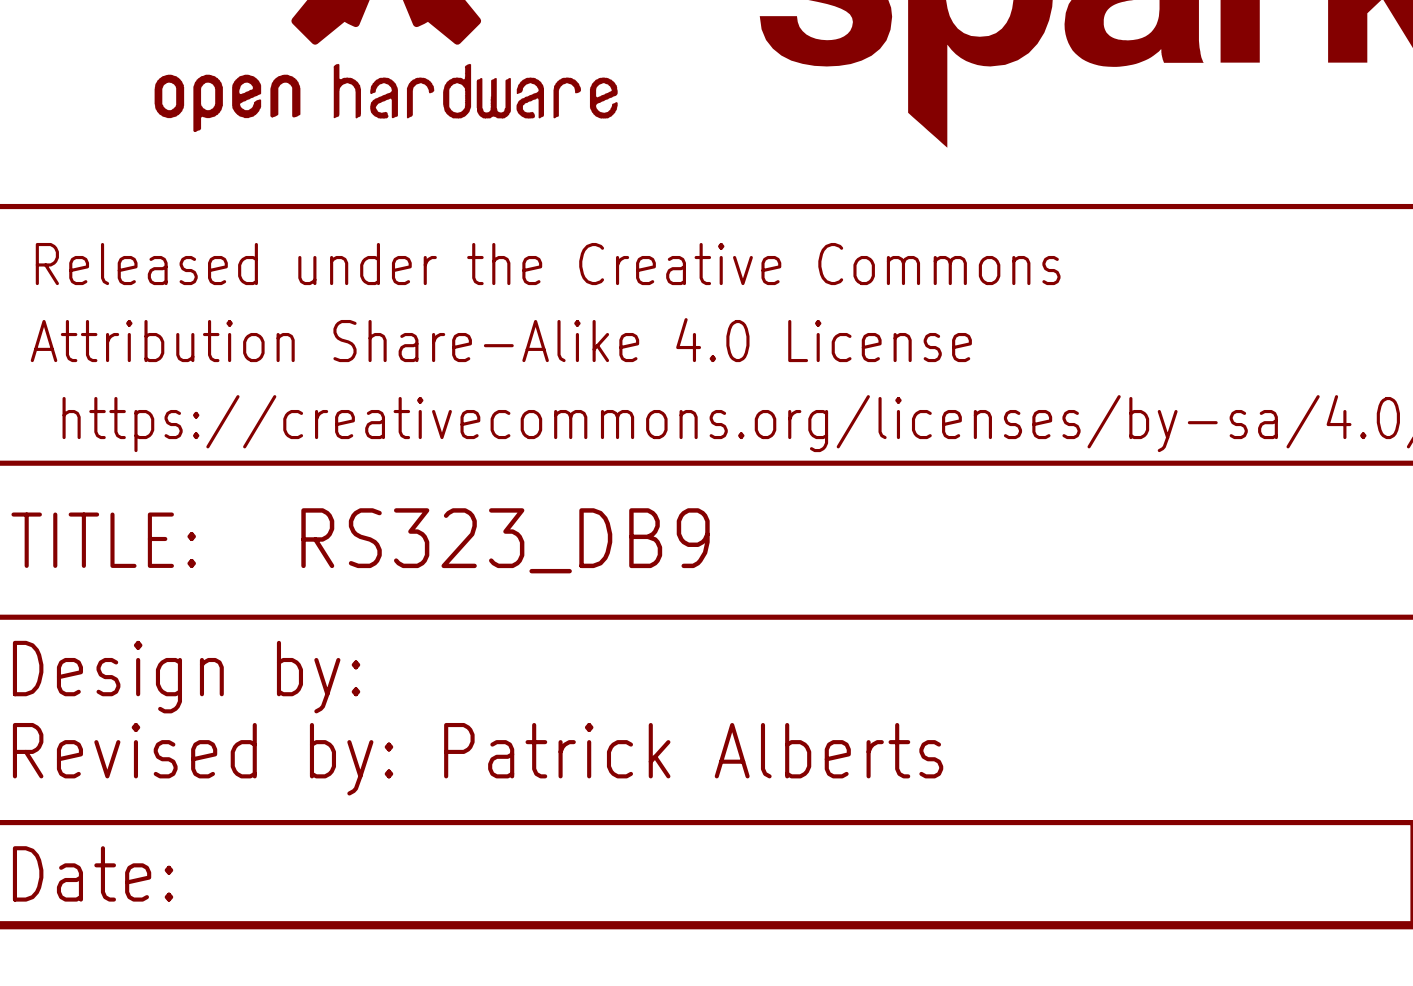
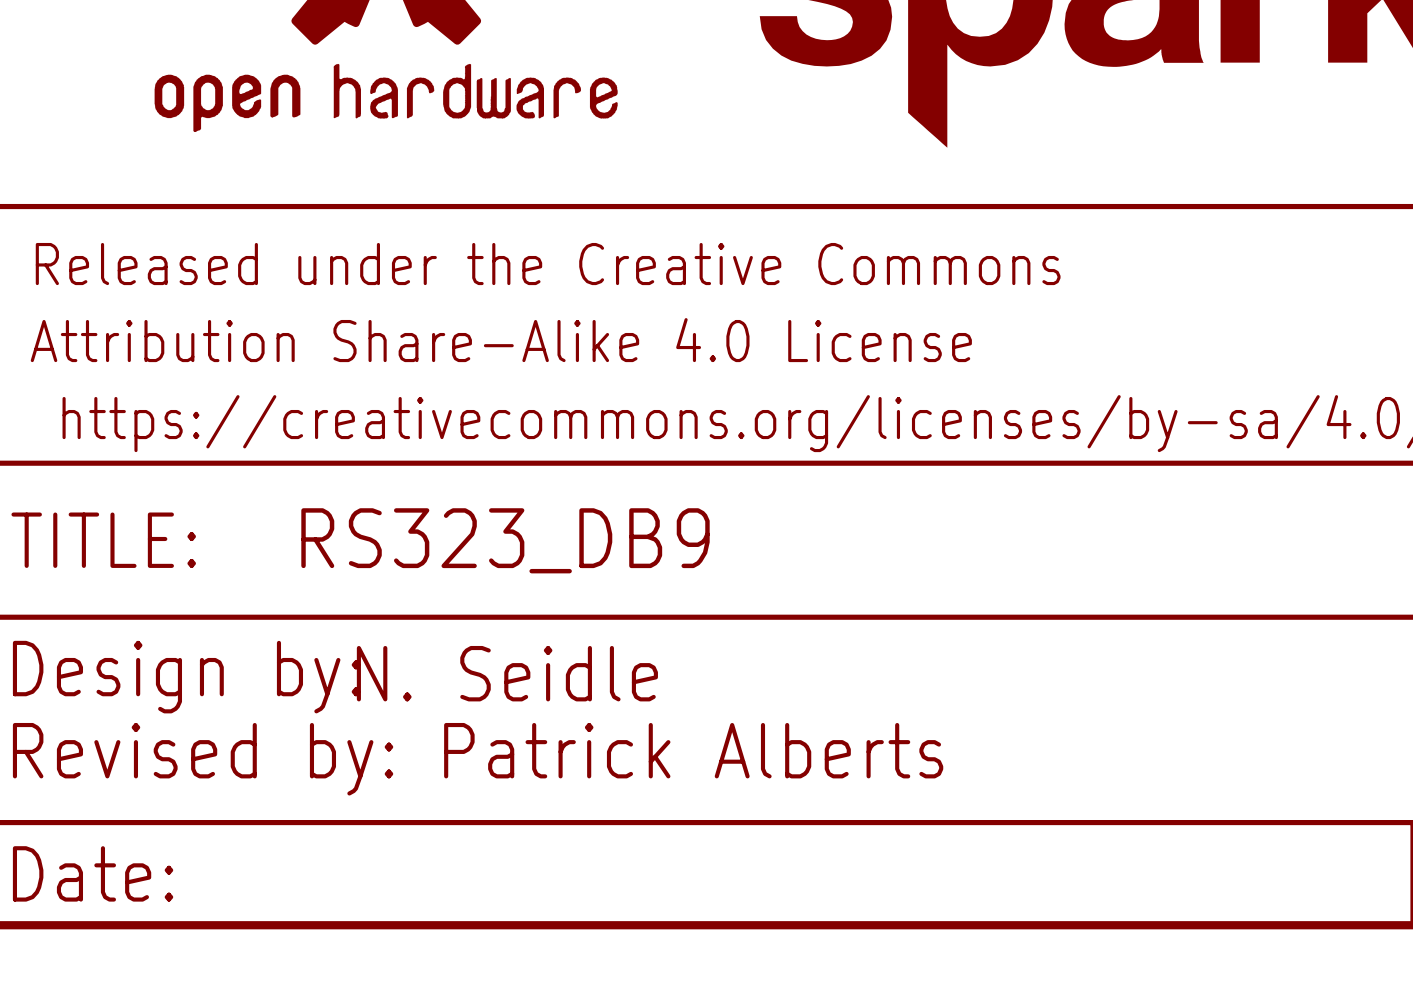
text: none -> N. Seidle (507, 673)

